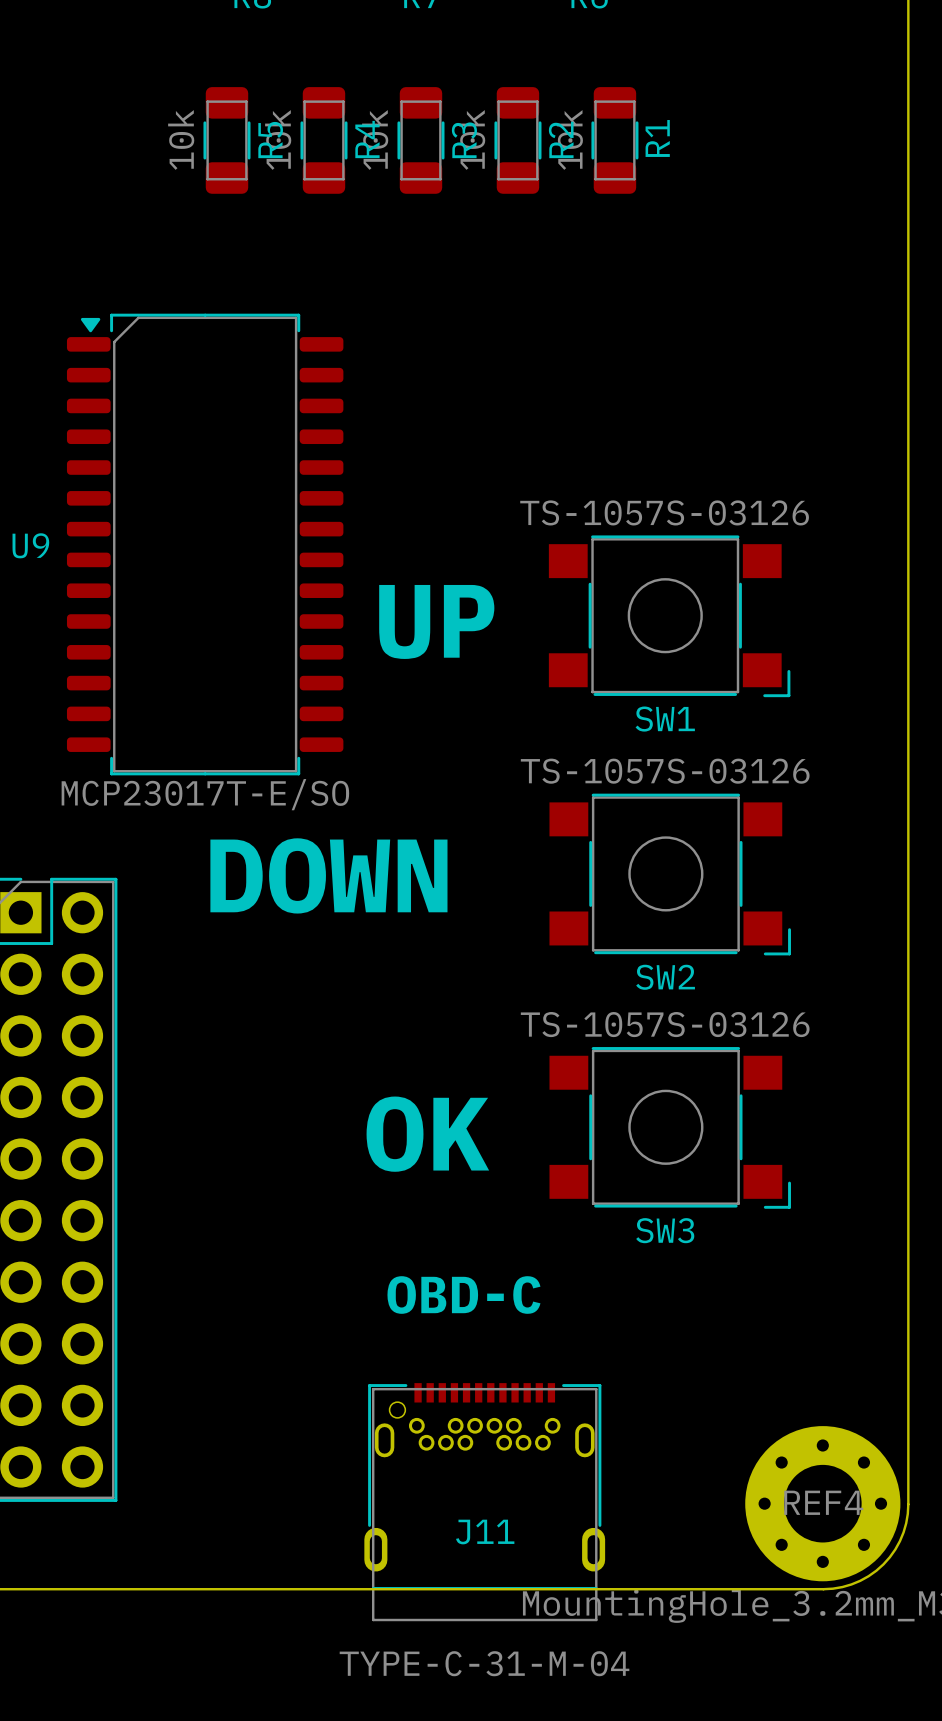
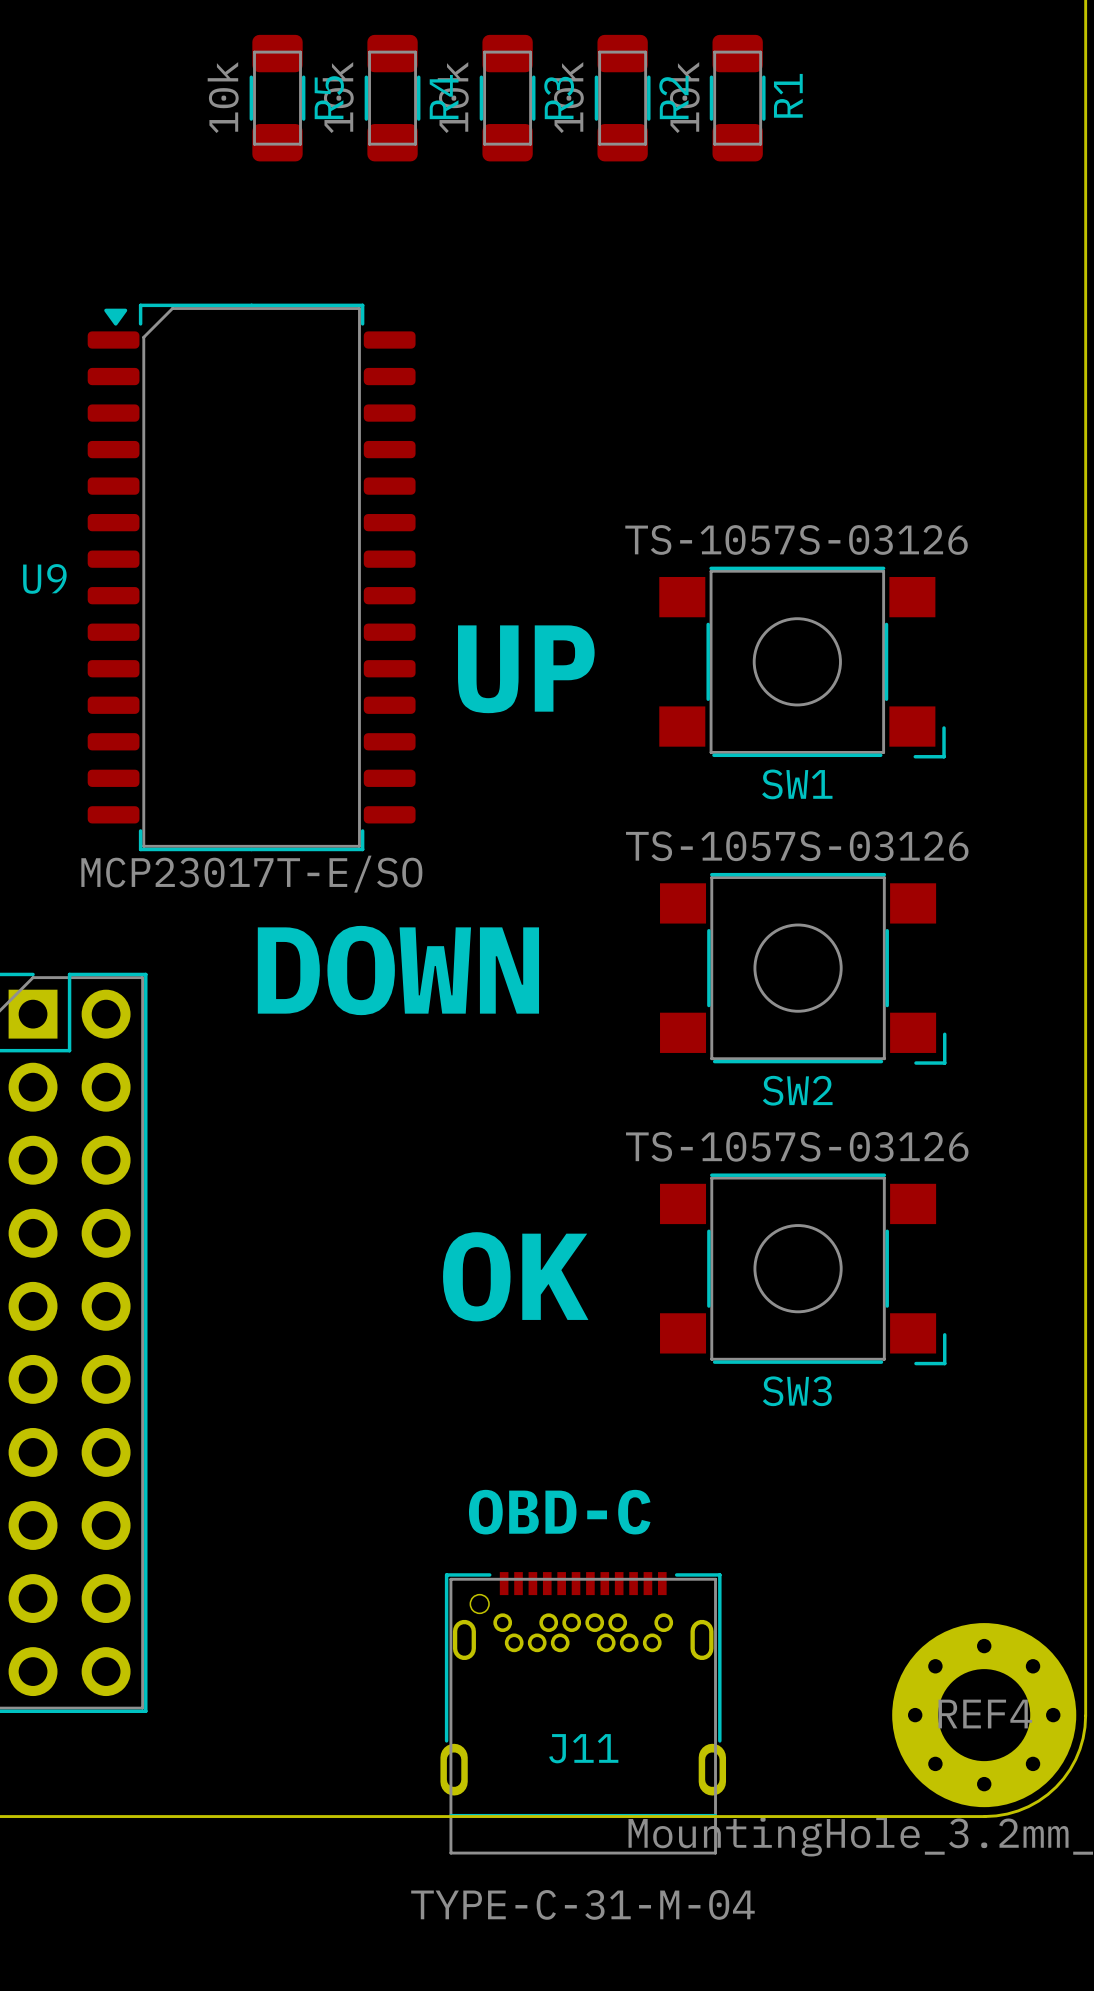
text position: OBD-C (463, 1295) -> OBD-C (559, 1512)

